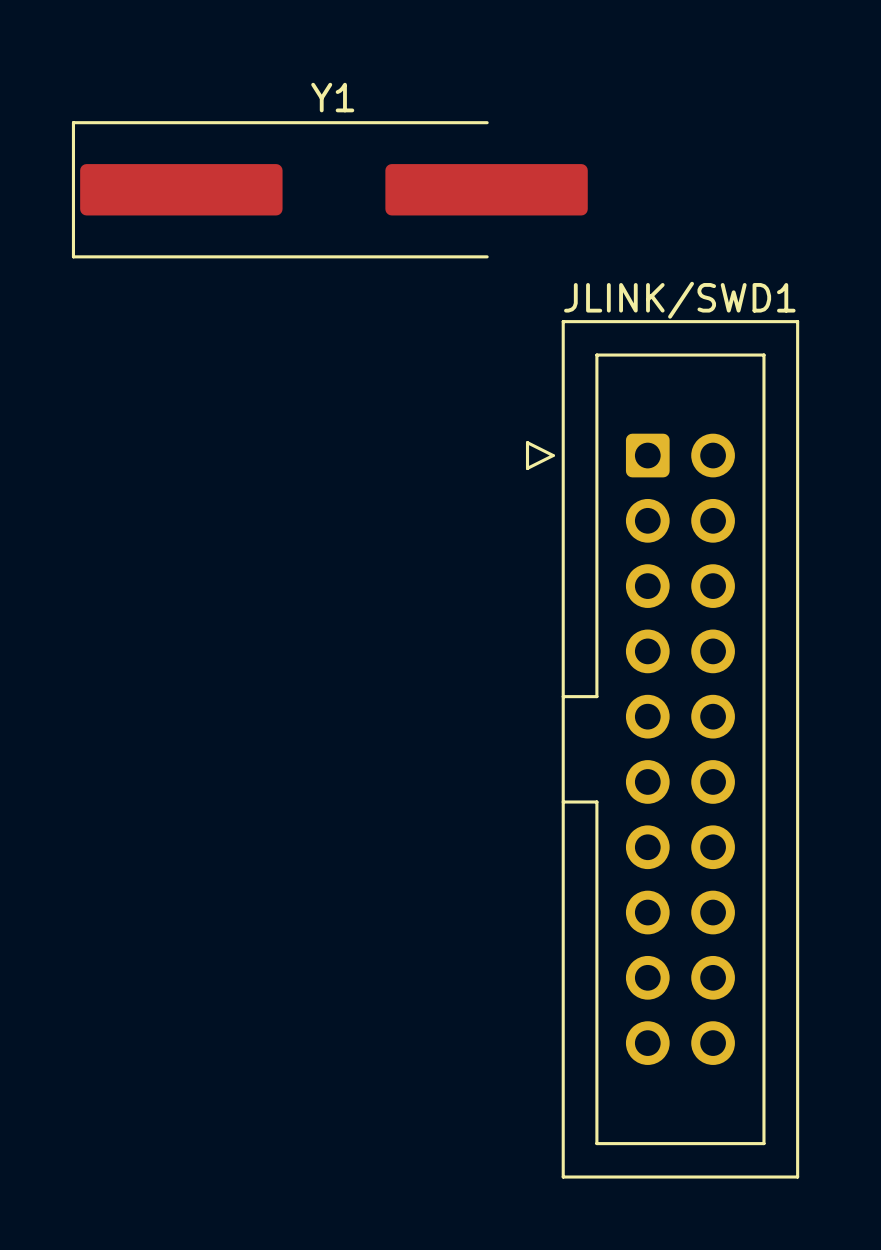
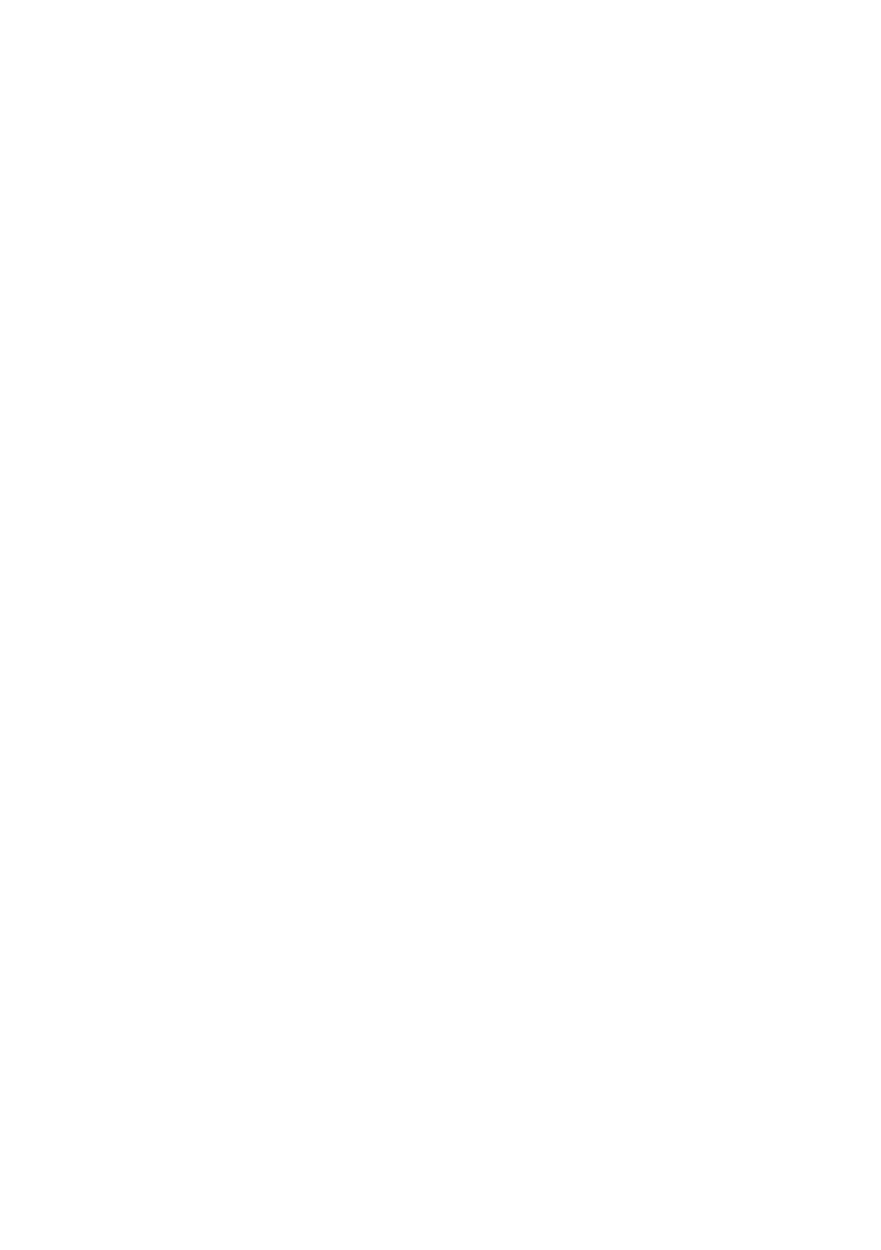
Y1: (329, 189) -> none
JLINK/SWD1: (662, 749) -> none

